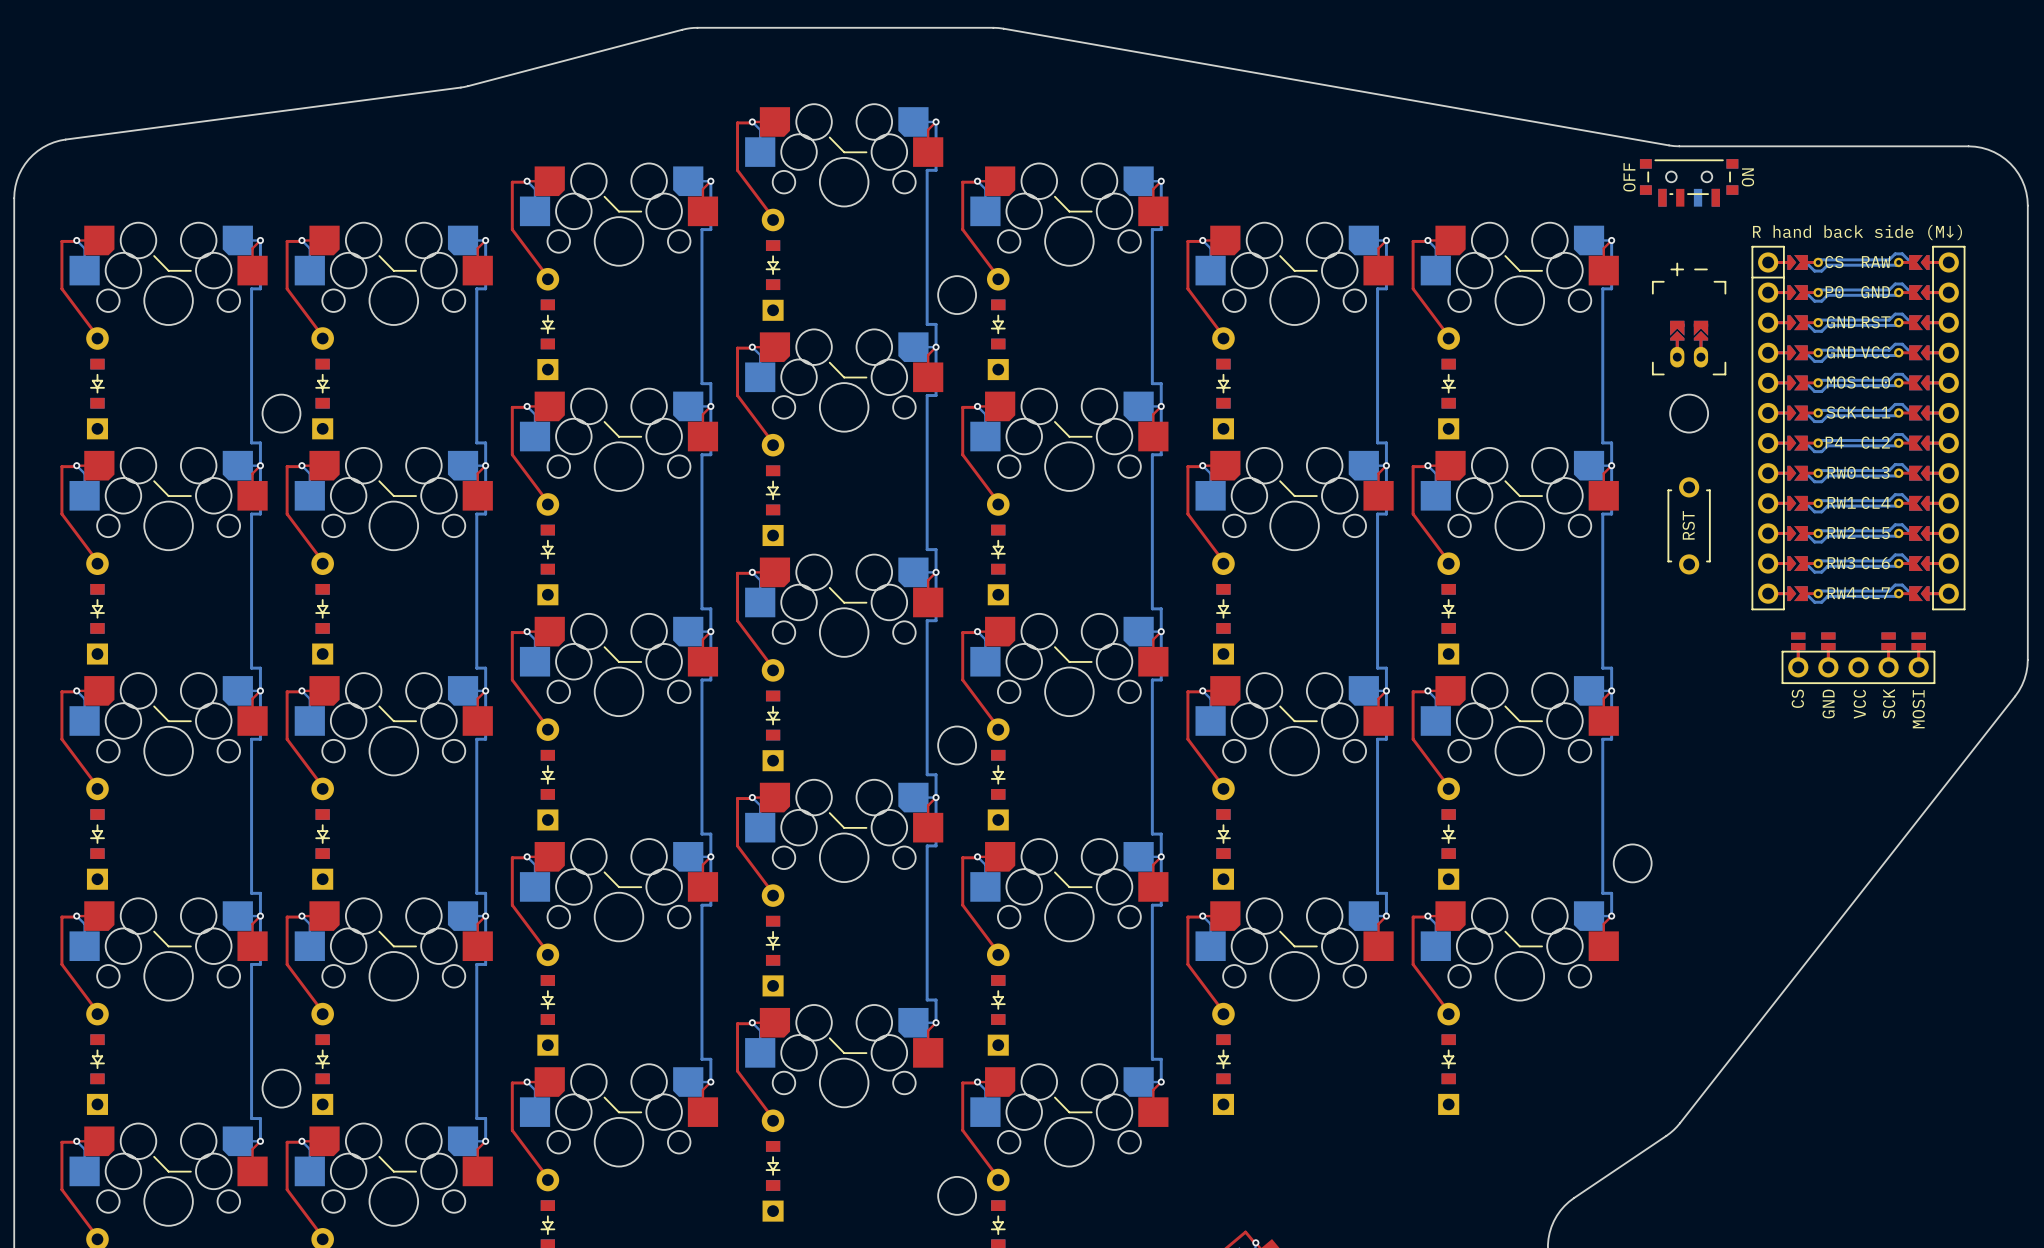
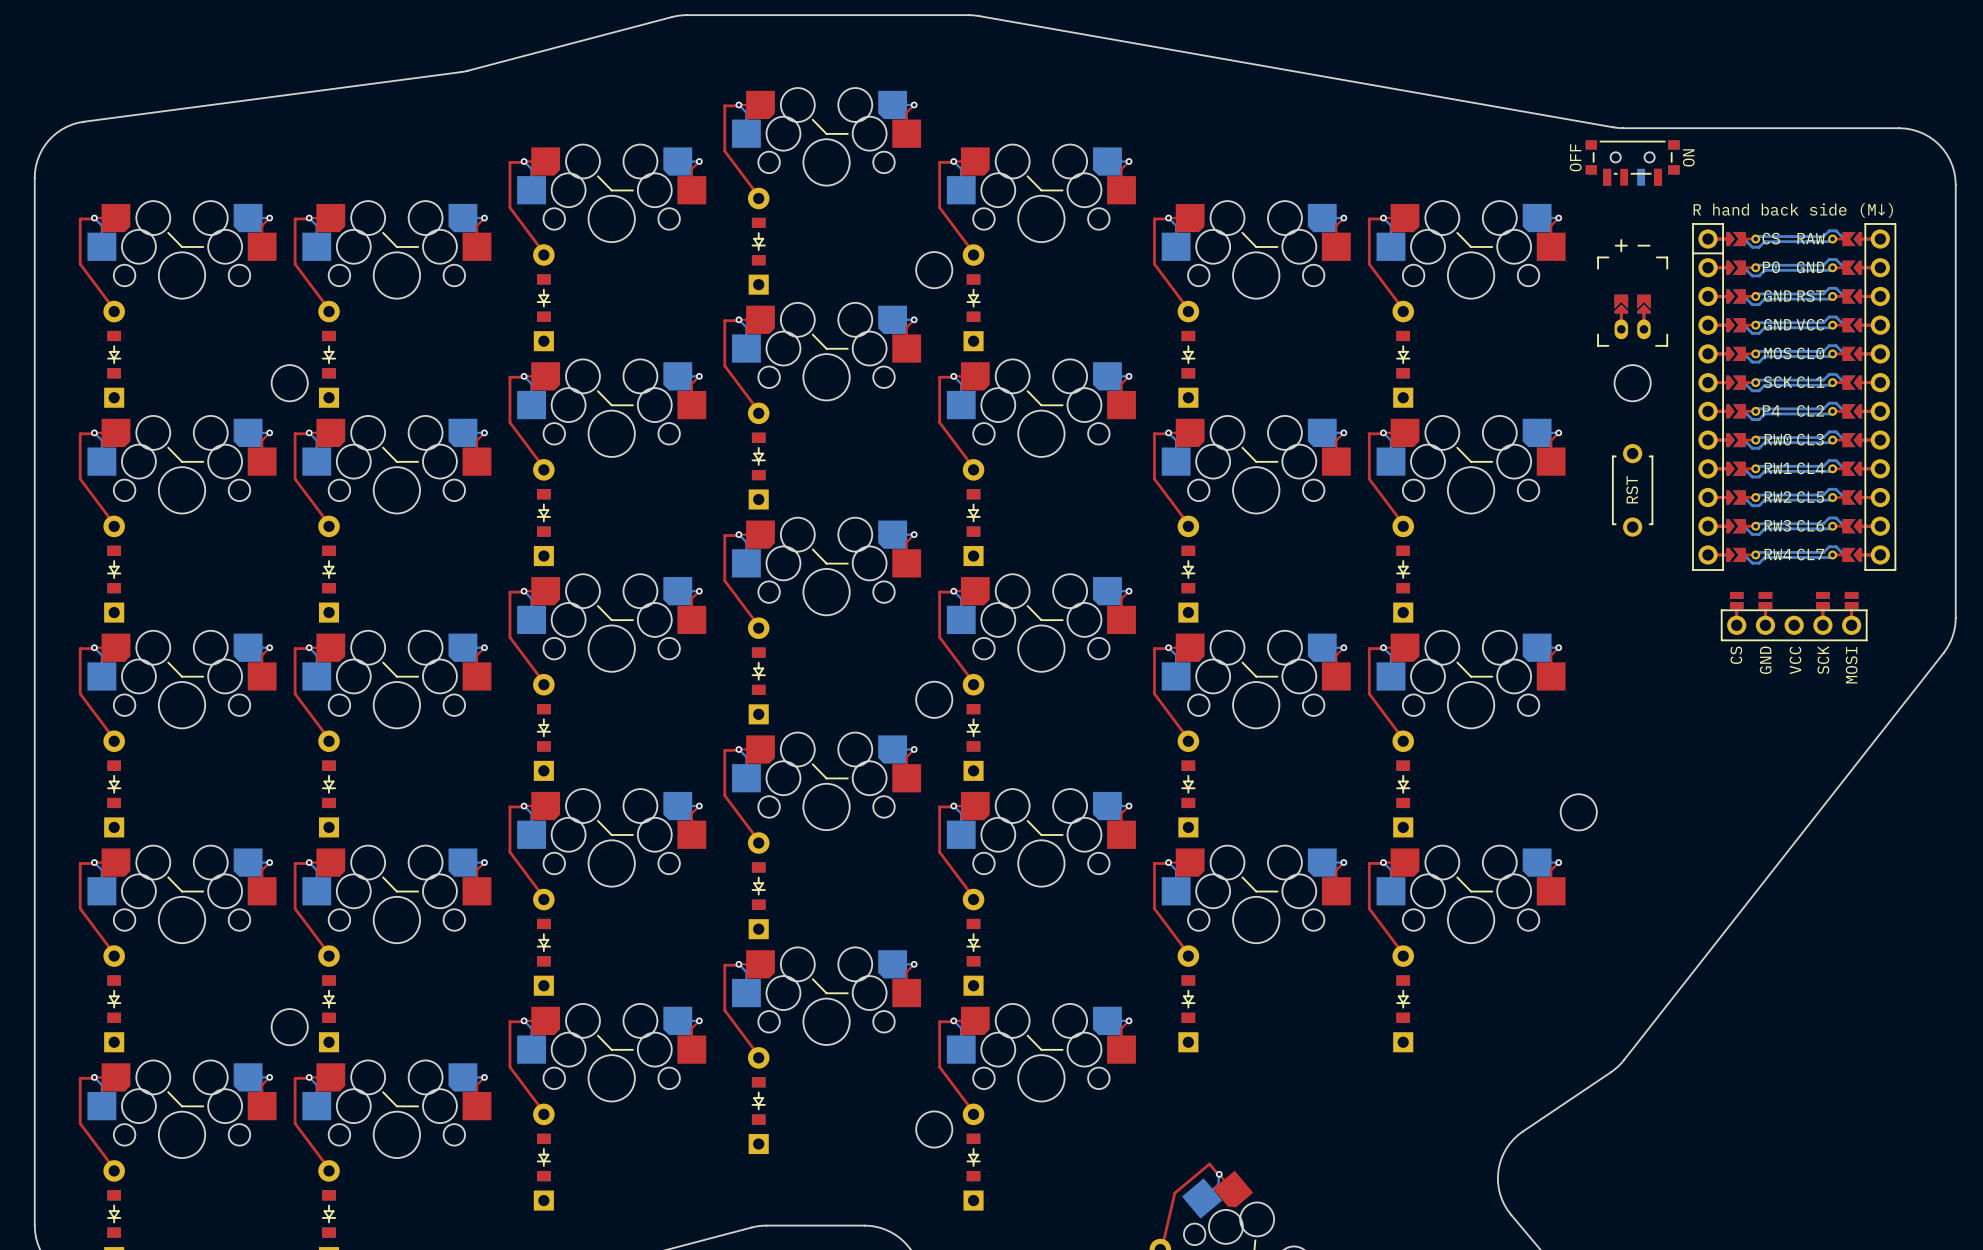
bottom track: (936, 122) (936, 170) (927, 170) (927, 324) (936, 324) (936, 395) (927, 395) (927, 549) (936, 549) (936, 620) (927, 620) (927, 774) (936, 774) (936, 845) (927, 845) (927, 1000) (936, 1000) (936, 1023) -> none
bottom track: (710, 182) (710, 229) (701, 229) (701, 383) (710, 383) (710, 454) (701, 454) (701, 608) (710, 608) (710, 679) (701, 679) (701, 834) (710, 834) (710, 905) (701, 905) (701, 1059) (710, 1059) (710, 1082) -> none
bottom track: (1161, 182) (1161, 229) (1152, 229) (1152, 383) (1161, 383) (1161, 454) (1152, 454) (1152, 608) (1161, 608) (1161, 679) (1152, 679) (1152, 834) (1161, 834) (1161, 905) (1152, 905) (1152, 1059) (1161, 1059) (1161, 1082) -> none
bottom track: (260, 241) (260, 288) (251, 288) (251, 442) (260, 442) (260, 514) (251, 514) (251, 668) (260, 668) (260, 739) (251, 739) (251, 893) (260, 893) (260, 964) (251, 964) (251, 1118) (260, 1118) (260, 1142) -> none
bottom track: (485, 241) (485, 288) (476, 288) (476, 442) (485, 442) (485, 514) (476, 514) (476, 668) (485, 668) (485, 739) (476, 739) (476, 893) (485, 893) (485, 964) (476, 964) (476, 1118) (485, 1118) (485, 1142) -> none
bottom track: (1386, 241) (1386, 288) (1377, 288) (1377, 442) (1386, 442) (1386, 514) (1377, 514) (1377, 668) (1386, 668) (1386, 739) (1377, 739) (1377, 893) (1386, 893) (1386, 917) -> none
bottom track: (1611, 241) (1611, 288) (1602, 288) (1602, 442) (1611, 442) (1611, 514) (1602, 514) (1602, 668) (1611, 668) (1611, 739) (1602, 739) (1602, 893) (1611, 893) (1611, 917) -> none

